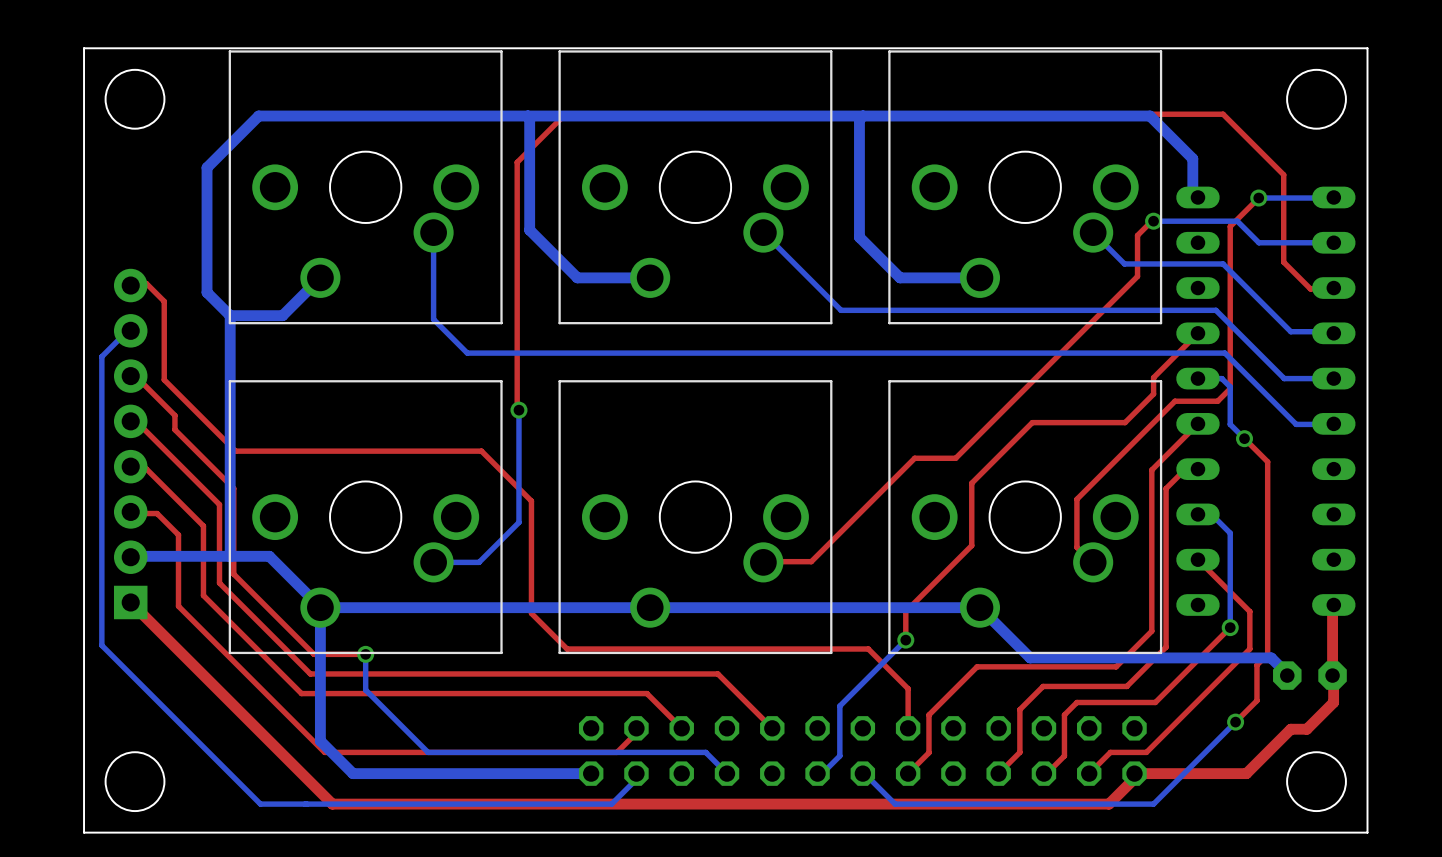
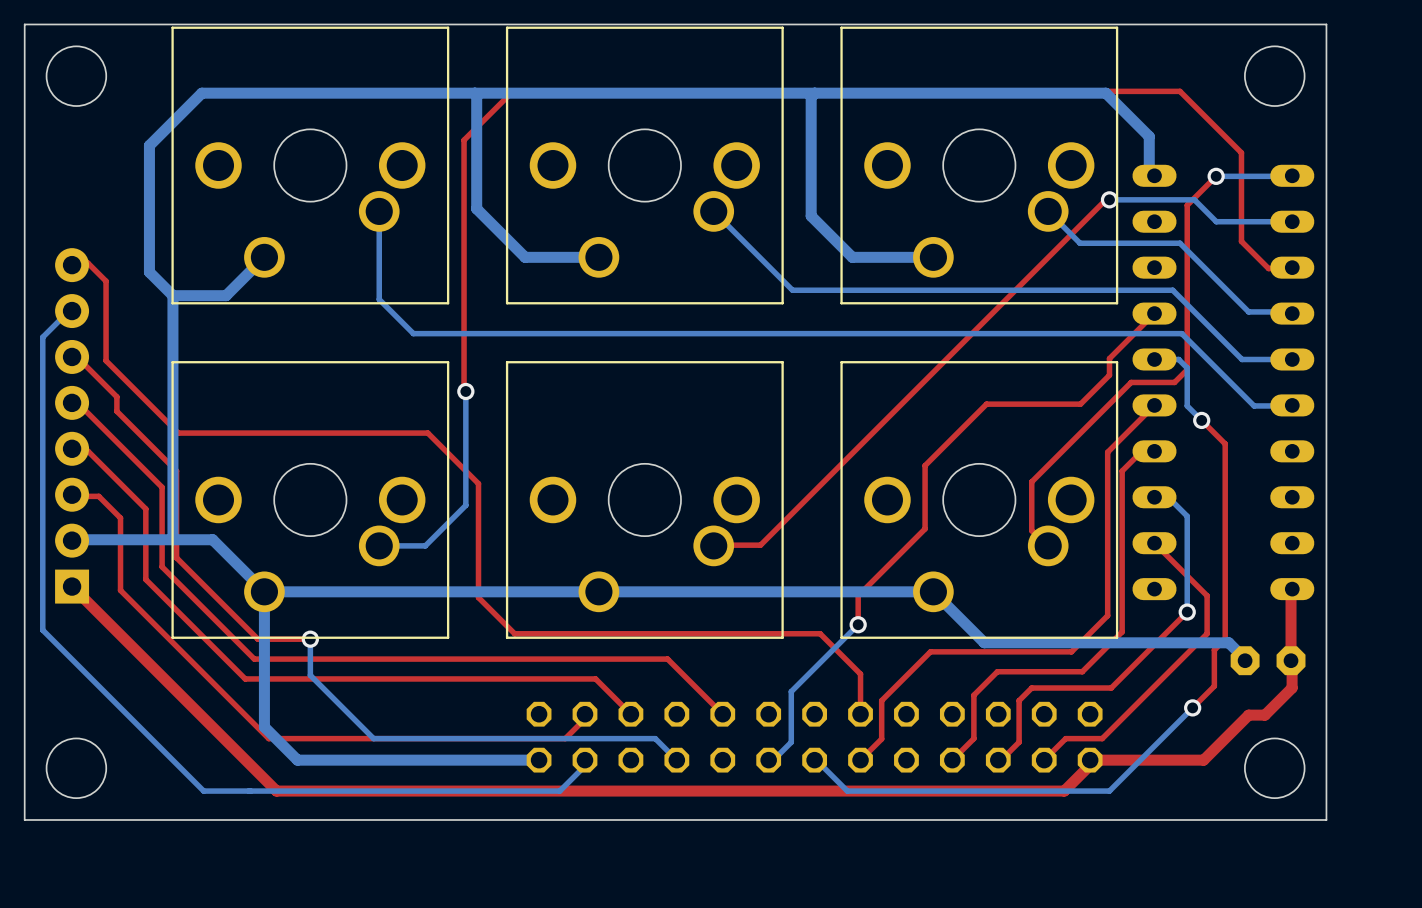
top track: (1151, 221) (1137, 235) (1137, 276) (955, 458) (914, 458) (809, 561) -> (1105, 199) (760, 545)

